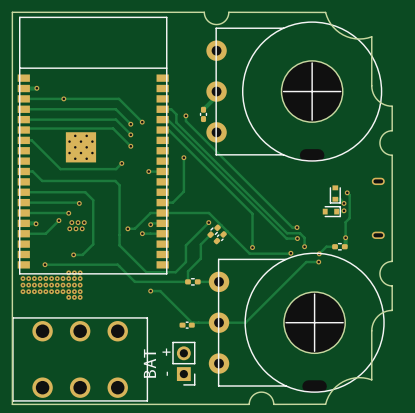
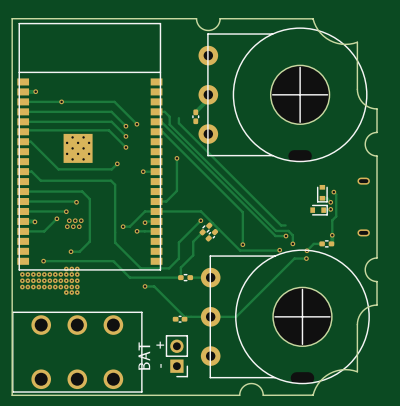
via: (185, 115) -> none
via: (297, 227) -> none

